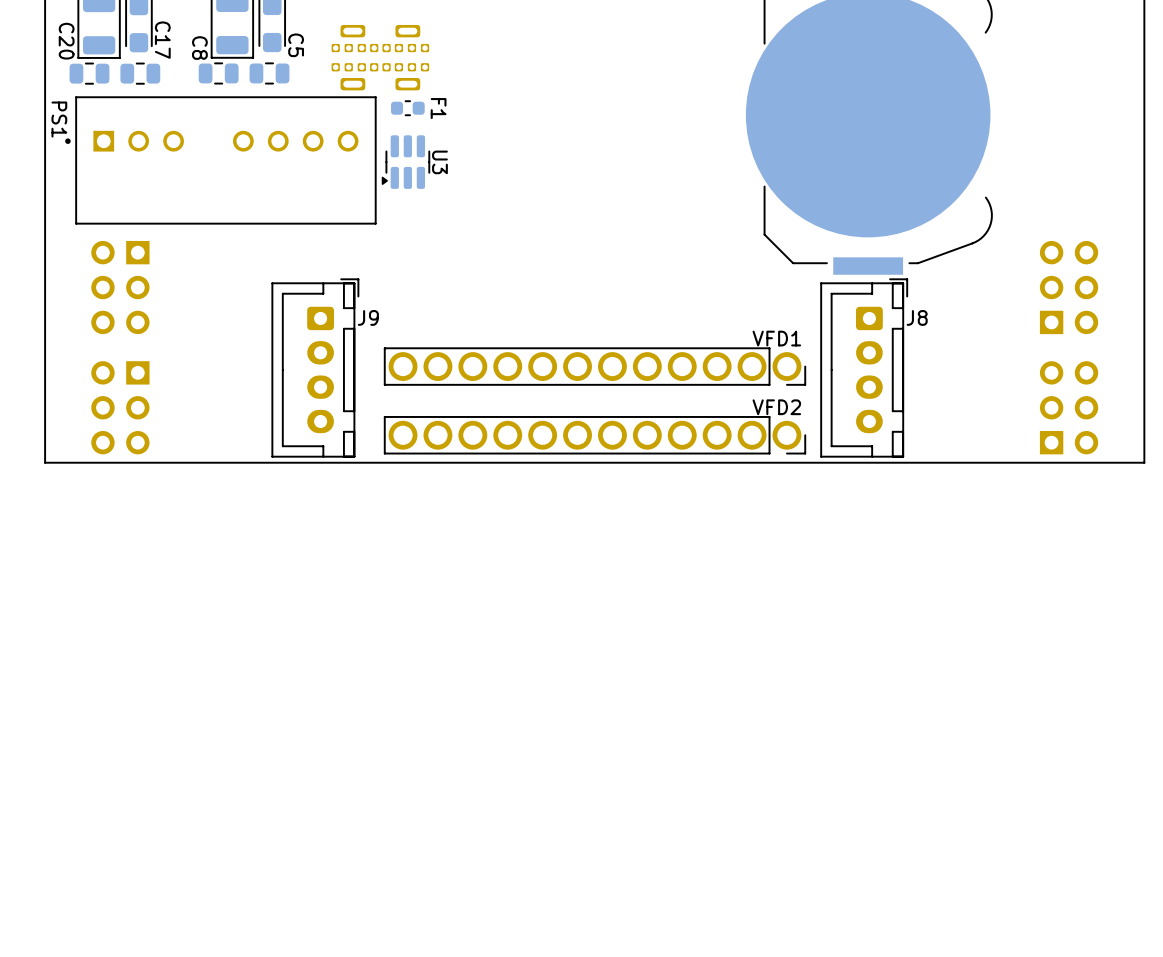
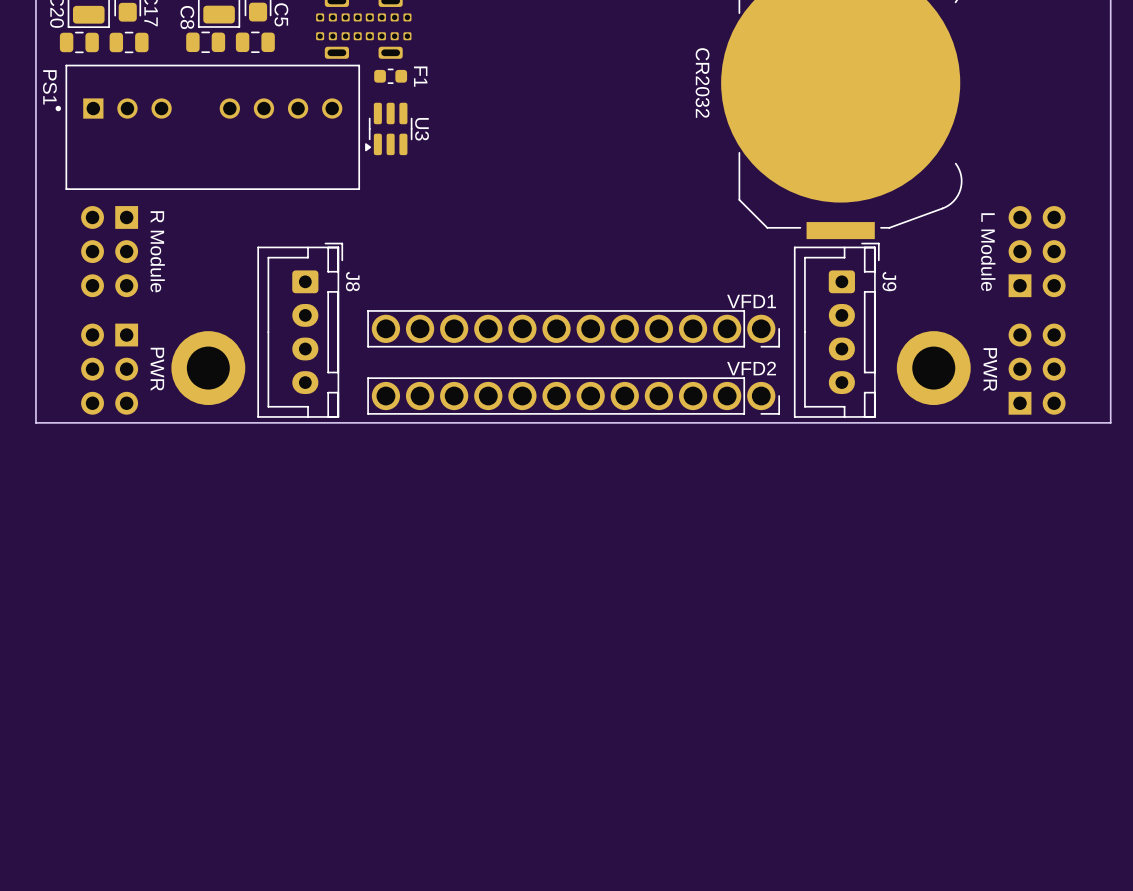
text: none -> CR2032 (702, 83)
text: none -> R Module (157, 251)
text: none -> L Module (988, 252)
J9 name: J9 (368, 317) -> J8 (352, 281)
J8 name: J8 (917, 317) -> J9 (889, 281)
part: none -> (208, 368)
part: none -> (933, 368)
text: none -> PWR (157, 369)
text: none -> PWR (990, 369)

